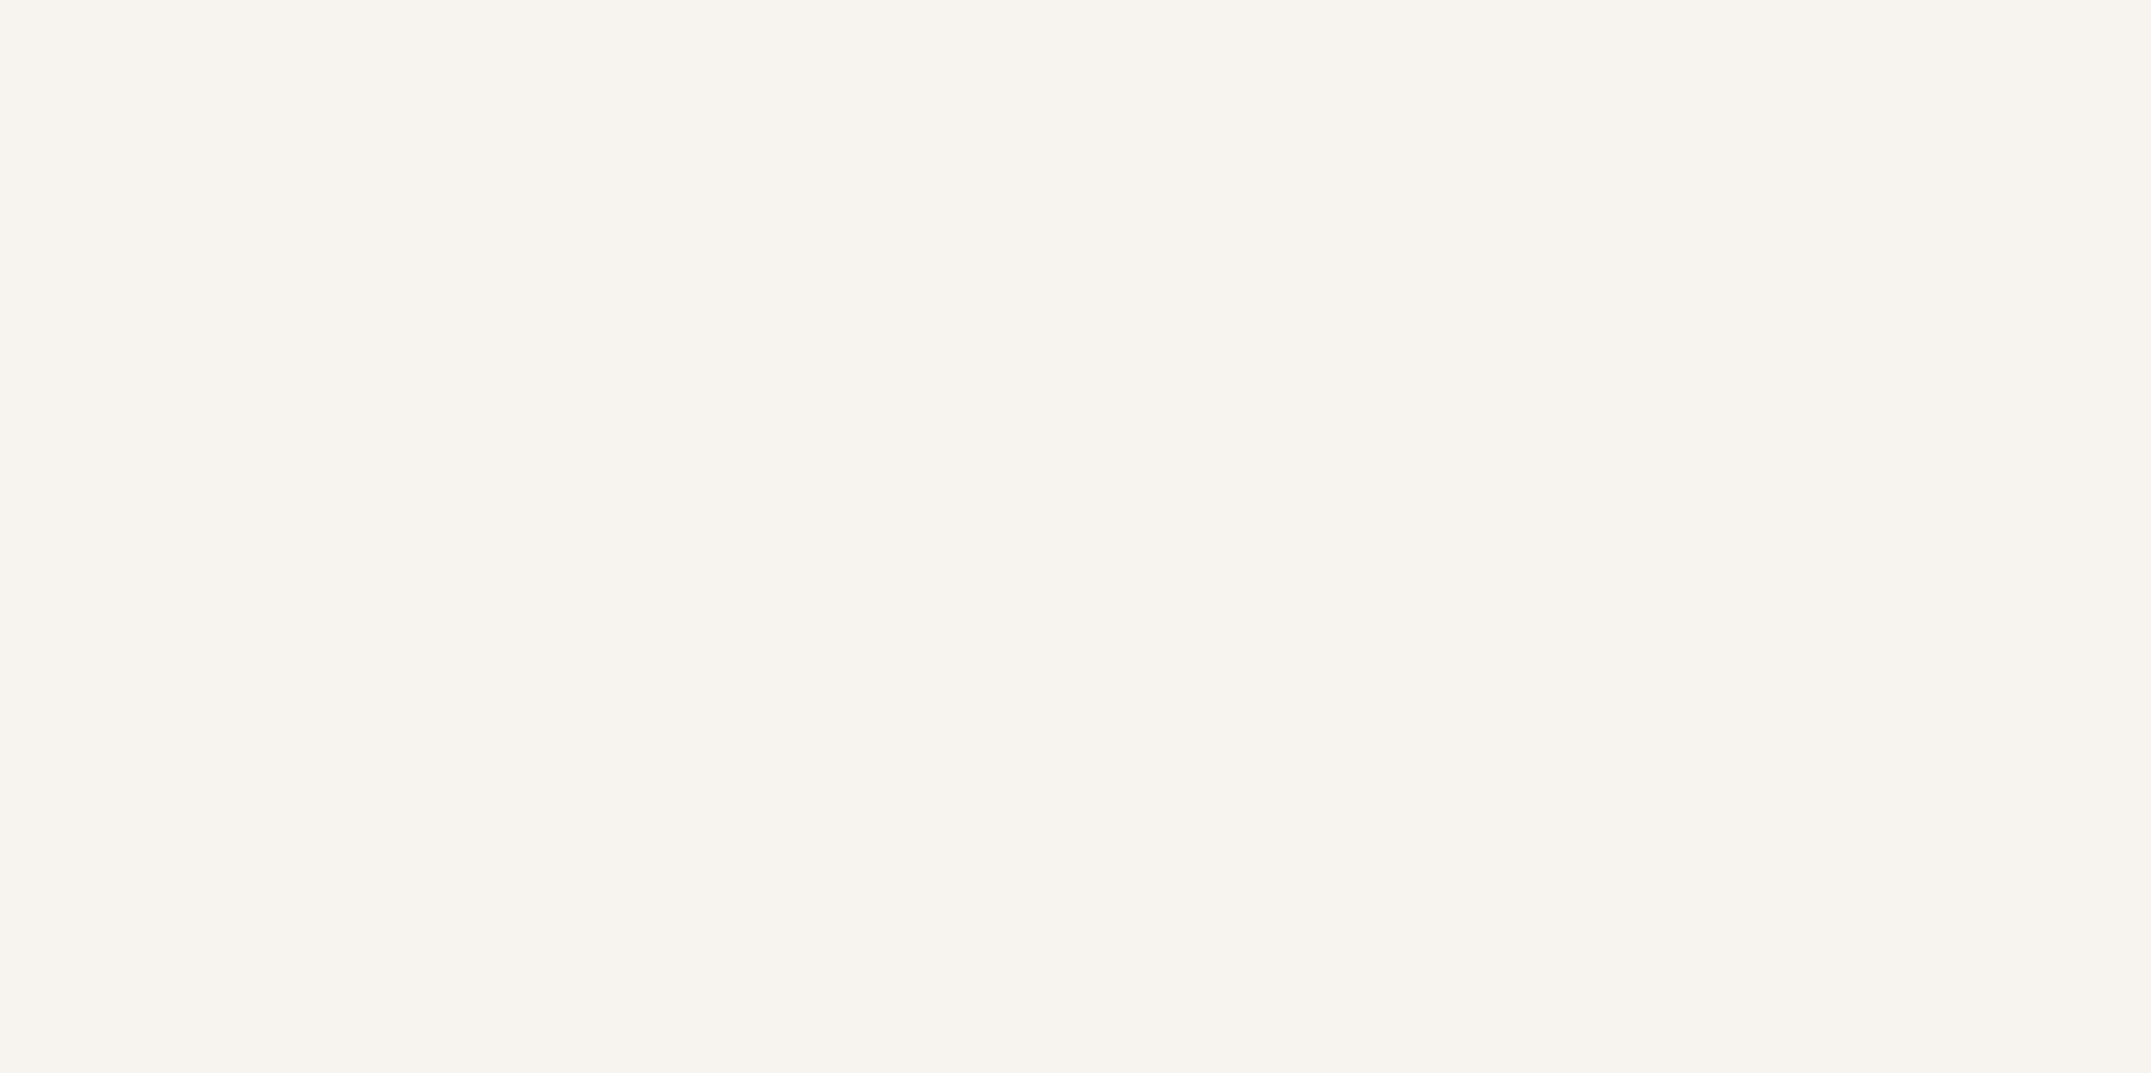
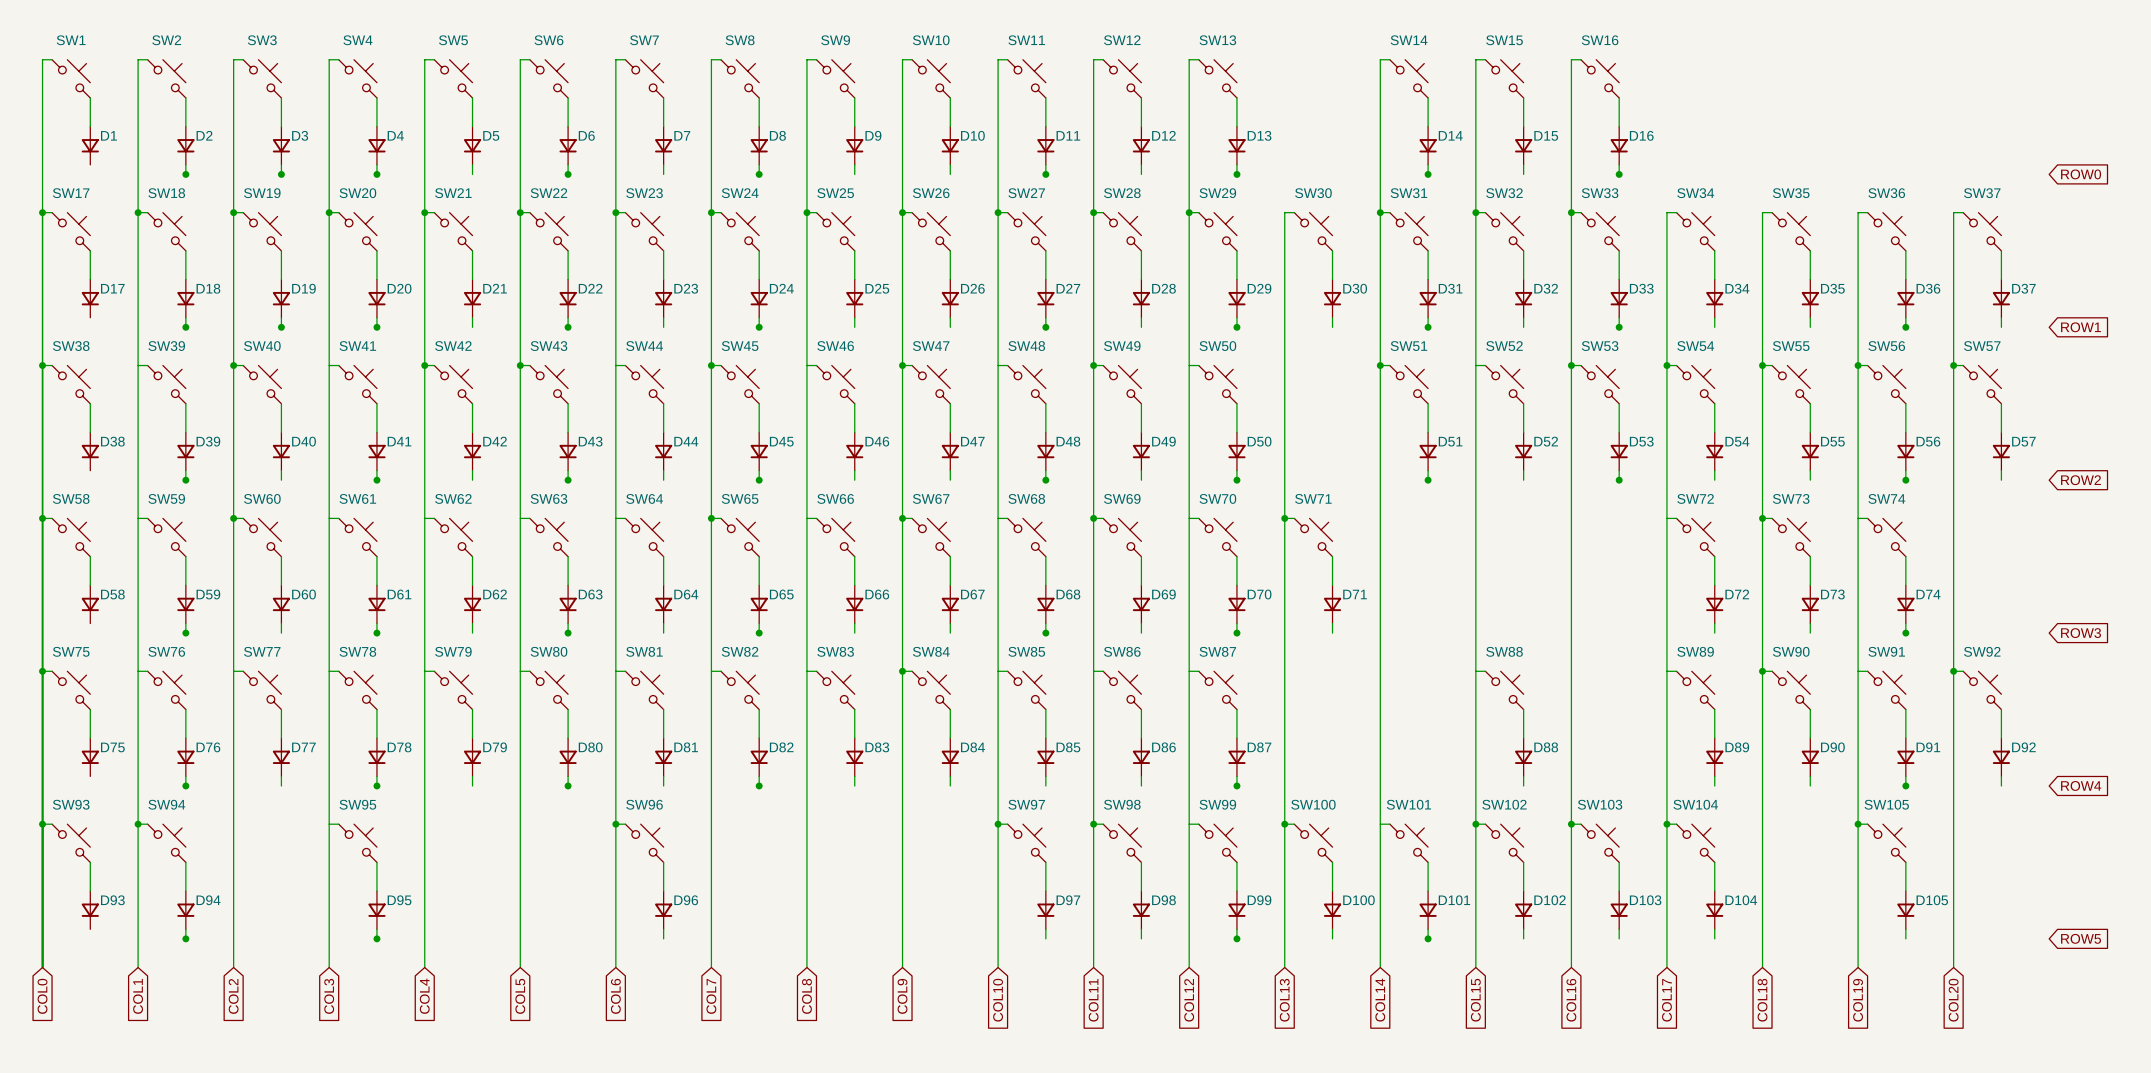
wire: none -> (52, 59) (42, 59) (42, 967)
wire: none -> (147, 59) (138, 59) (138, 967)
wire: none -> (243, 59) (233, 59) (233, 967)
wire: none -> (338, 59) (329, 59) (329, 967)
wire: none -> (434, 59) (424, 59) (424, 967)
wire: none -> (529, 59) (520, 59) (520, 967)
wire: none -> (625, 59) (615, 59) (615, 967)
wire: none -> (720, 59) (711, 59) (711, 967)
wire: none -> (816, 59) (806, 59) (806, 967)
wire: none -> (912, 59) (902, 59) (902, 967)
wire: none -> (1007, 59) (998, 59) (998, 967)
wire: none -> (1103, 59) (1093, 59) (1093, 967)
wire: none -> (1198, 59) (1189, 59) (1189, 967)
wire: none -> (1389, 59) (1380, 59) (1380, 967)
wire: none -> (1485, 59) (1475, 59) (1475, 967)
wire: none -> (1580, 59) (1571, 59) (1571, 967)
SW1: none -> (71, 78)
SW2: none -> (166, 78)
SW3: none -> (262, 78)
SW4: none -> (357, 78)
SW5: none -> (453, 78)
SW6: none -> (548, 78)
SW7: none -> (644, 78)
SW8: none -> (740, 78)
SW9: none -> (835, 78)
SW10: none -> (931, 78)
SW11: none -> (1026, 78)
SW12: none -> (1122, 78)
SW13: none -> (1217, 78)
SW14: none -> (1408, 78)
SW15: none -> (1504, 78)
SW16: none -> (1600, 78)
wire: none -> (90, 97) (90, 126)
wire: none -> (185, 97) (185, 126)
wire: none -> (281, 97) (281, 126)
wire: none -> (376, 97) (376, 126)
wire: none -> (472, 97) (472, 126)
wire: none -> (568, 97) (568, 126)
wire: none -> (663, 97) (663, 126)
wire: none -> (759, 97) (759, 126)
wire: none -> (854, 97) (854, 126)
wire: none -> (950, 97) (950, 126)
wire: none -> (1045, 97) (1045, 126)
wire: none -> (1141, 97) (1141, 126)
wire: none -> (1236, 97) (1236, 126)
wire: none -> (1428, 97) (1428, 126)
wire: none -> (1523, 97) (1523, 126)
wire: none -> (1619, 97) (1619, 126)
D1: none -> (90, 145)
D2: none -> (185, 145)
D3: none -> (281, 145)
D4: none -> (376, 145)
D5: none -> (472, 145)
D6: none -> (568, 145)
D7: none -> (663, 145)
D8: none -> (759, 145)
D9: none -> (854, 145)
D10: none -> (950, 145)
D11: none -> (1045, 145)
D12: none -> (1141, 145)
D13: none -> (1236, 145)
D14: none -> (1428, 145)
D15: none -> (1523, 145)
D16: none -> (1619, 145)
wire: none -> (185, 164) (185, 174)
wire: none -> (281, 164) (281, 174)
wire: none -> (376, 164) (376, 174)
wire: none -> (472, 164) (472, 174)
wire: none -> (568, 164) (568, 174)
wire: none -> (663, 164) (663, 174)
wire: none -> (759, 164) (759, 174)
wire: none -> (854, 164) (854, 174)
wire: none -> (950, 164) (950, 174)
wire: none -> (1045, 164) (1045, 174)
wire: none -> (1141, 164) (1141, 174)
wire: none -> (1236, 164) (1236, 174)
wire: none -> (1428, 164) (1428, 174)
wire: none -> (1523, 164) (1523, 174)
wire: none -> (1619, 164) (1619, 174)
junction: none -> (185, 174)
junction: none -> (281, 174)
junction: none -> (376, 174)
junction: none -> (568, 174)
junction: none -> (759, 174)
junction: none -> (1045, 174)
junction: none -> (1236, 174)
junction: none -> (1428, 174)
junction: none -> (1619, 174)
global label: none -> ROW0 (2081, 174)
wire: none -> (42, 212) (52, 212)
junction: none -> (42, 212)
wire: none -> (138, 212) (147, 212)
junction: none -> (138, 212)
wire: none -> (233, 212) (243, 212)
junction: none -> (233, 212)
wire: none -> (329, 212) (338, 212)
junction: none -> (329, 212)
wire: none -> (424, 212) (434, 212)
junction: none -> (424, 212)
wire: none -> (520, 212) (529, 212)
junction: none -> (520, 212)
wire: none -> (615, 212) (625, 212)
junction: none -> (615, 212)
wire: none -> (711, 212) (720, 212)
junction: none -> (711, 212)
wire: none -> (806, 212) (816, 212)
junction: none -> (806, 212)
wire: none -> (902, 212) (912, 212)
junction: none -> (902, 212)
wire: none -> (998, 212) (1007, 212)
junction: none -> (998, 212)
wire: none -> (1093, 212) (1103, 212)
junction: none -> (1093, 212)
wire: none -> (1189, 212) (1198, 212)
junction: none -> (1189, 212)
wire: none -> (1294, 212) (1284, 212) (1284, 967)
wire: none -> (1380, 212) (1389, 212)
junction: none -> (1380, 212)
wire: none -> (1475, 212) (1485, 212)
junction: none -> (1475, 212)
wire: none -> (1571, 212) (1580, 212)
junction: none -> (1571, 212)
wire: none -> (1676, 212) (1666, 212) (1666, 967)
wire: none -> (1772, 212) (1762, 212) (1762, 967)
wire: none -> (1867, 212) (1858, 212) (1858, 967)
wire: none -> (1963, 212) (1953, 212) (1953, 967)
SW17: none -> (71, 231)
SW18: none -> (166, 231)
SW19: none -> (262, 231)
SW20: none -> (357, 231)
SW21: none -> (453, 231)
SW22: none -> (548, 231)
SW23: none -> (644, 231)
SW24: none -> (740, 231)
SW25: none -> (835, 231)
SW26: none -> (931, 231)
SW27: none -> (1026, 231)
SW28: none -> (1122, 231)
SW29: none -> (1217, 231)
SW30: none -> (1313, 231)
SW31: none -> (1408, 231)
SW32: none -> (1504, 231)
SW33: none -> (1600, 231)
SW34: none -> (1695, 231)
SW35: none -> (1791, 231)
SW36: none -> (1886, 231)
SW37: none -> (1982, 231)
wire: none -> (90, 250) (90, 279)
wire: none -> (185, 250) (185, 279)
wire: none -> (281, 250) (281, 279)
wire: none -> (376, 250) (376, 279)
wire: none -> (472, 250) (472, 279)
wire: none -> (568, 250) (568, 279)
wire: none -> (663, 250) (663, 279)
wire: none -> (759, 250) (759, 279)
wire: none -> (854, 250) (854, 279)
wire: none -> (950, 250) (950, 279)
wire: none -> (1045, 250) (1045, 279)
wire: none -> (1141, 250) (1141, 279)
wire: none -> (1236, 250) (1236, 279)
wire: none -> (1332, 250) (1332, 279)
wire: none -> (1428, 250) (1428, 279)
wire: none -> (1523, 250) (1523, 279)
wire: none -> (1619, 250) (1619, 279)
wire: none -> (1714, 250) (1714, 279)
wire: none -> (1810, 250) (1810, 279)
wire: none -> (1905, 250) (1905, 279)
wire: none -> (2001, 250) (2001, 279)
D17: none -> (90, 298)
D18: none -> (185, 298)
D19: none -> (281, 298)
D20: none -> (376, 298)
D21: none -> (472, 298)
D22: none -> (568, 298)
D23: none -> (663, 298)
D24: none -> (759, 298)
D25: none -> (854, 298)
D26: none -> (950, 298)
D27: none -> (1045, 298)
D28: none -> (1141, 298)
D29: none -> (1236, 298)
D30: none -> (1332, 298)
D31: none -> (1428, 298)
D32: none -> (1523, 298)
D33: none -> (1619, 298)
D34: none -> (1714, 298)
D35: none -> (1810, 298)
D36: none -> (1905, 298)
D37: none -> (2001, 298)
wire: none -> (185, 317) (185, 327)
wire: none -> (281, 317) (281, 327)
wire: none -> (376, 317) (376, 327)
wire: none -> (472, 317) (472, 327)
wire: none -> (568, 317) (568, 327)
wire: none -> (663, 317) (663, 327)
wire: none -> (759, 317) (759, 327)
wire: none -> (854, 317) (854, 327)
wire: none -> (950, 317) (950, 327)
wire: none -> (1045, 317) (1045, 327)
wire: none -> (1141, 317) (1141, 327)
wire: none -> (1236, 317) (1236, 327)
wire: none -> (1332, 317) (1332, 327)
wire: none -> (1428, 317) (1428, 327)
wire: none -> (1523, 317) (1523, 327)
wire: none -> (1619, 317) (1619, 327)
wire: none -> (1714, 317) (1714, 327)
wire: none -> (1810, 317) (1810, 327)
wire: none -> (1905, 317) (1905, 327)
wire: none -> (2001, 317) (2001, 327)
junction: none -> (185, 327)
junction: none -> (281, 327)
junction: none -> (376, 327)
junction: none -> (568, 327)
junction: none -> (759, 327)
junction: none -> (1045, 327)
junction: none -> (1236, 327)
junction: none -> (1428, 327)
junction: none -> (1619, 327)
junction: none -> (1905, 327)
global label: none -> ROW1 (2081, 327)
wire: none -> (42, 365) (52, 365)
junction: none -> (42, 365)
wire: none -> (138, 365) (147, 365)
wire: none -> (233, 365) (243, 365)
junction: none -> (233, 365)
wire: none -> (329, 365) (338, 365)
wire: none -> (424, 365) (434, 365)
junction: none -> (424, 365)
wire: none -> (520, 365) (529, 365)
junction: none -> (520, 365)
wire: none -> (615, 365) (625, 365)
wire: none -> (711, 365) (720, 365)
junction: none -> (711, 365)
wire: none -> (806, 365) (816, 365)
wire: none -> (902, 365) (912, 365)
junction: none -> (902, 365)
wire: none -> (998, 365) (1007, 365)
wire: none -> (1093, 365) (1103, 365)
junction: none -> (1093, 365)
wire: none -> (1189, 365) (1198, 365)
wire: none -> (1380, 365) (1389, 365)
junction: none -> (1380, 365)
wire: none -> (1475, 365) (1485, 365)
wire: none -> (1571, 365) (1580, 365)
junction: none -> (1571, 365)
wire: none -> (1666, 365) (1676, 365)
junction: none -> (1666, 365)
wire: none -> (1762, 365) (1772, 365)
junction: none -> (1762, 365)
wire: none -> (1858, 365) (1867, 365)
junction: none -> (1858, 365)
wire: none -> (1953, 365) (1963, 365)
junction: none -> (1953, 365)
SW38: none -> (71, 384)
SW39: none -> (166, 384)
SW40: none -> (262, 384)
SW41: none -> (357, 384)
SW42: none -> (453, 384)
SW43: none -> (548, 384)
SW44: none -> (644, 384)
SW45: none -> (740, 384)
SW46: none -> (835, 384)
SW47: none -> (931, 384)
SW48: none -> (1026, 384)
SW49: none -> (1122, 384)
SW50: none -> (1217, 384)
SW51: none -> (1408, 384)
SW52: none -> (1504, 384)
SW53: none -> (1600, 384)
SW54: none -> (1695, 384)
SW55: none -> (1791, 384)
SW56: none -> (1886, 384)
SW57: none -> (1982, 384)
wire: none -> (90, 403) (90, 432)
wire: none -> (185, 403) (185, 432)
wire: none -> (281, 403) (281, 432)
wire: none -> (376, 403) (376, 432)
wire: none -> (472, 403) (472, 432)
wire: none -> (568, 403) (568, 432)
wire: none -> (663, 403) (663, 432)
wire: none -> (759, 403) (759, 432)
wire: none -> (854, 403) (854, 432)
wire: none -> (950, 403) (950, 432)
wire: none -> (1045, 403) (1045, 432)
wire: none -> (1141, 403) (1141, 432)
wire: none -> (1236, 403) (1236, 432)
wire: none -> (1428, 403) (1428, 432)
wire: none -> (1523, 403) (1523, 432)
wire: none -> (1619, 403) (1619, 432)
wire: none -> (1714, 403) (1714, 432)
wire: none -> (1810, 403) (1810, 432)
wire: none -> (1905, 403) (1905, 432)
wire: none -> (2001, 403) (2001, 432)
D38: none -> (90, 451)
D39: none -> (185, 451)
D40: none -> (281, 451)
D41: none -> (376, 451)
D42: none -> (472, 451)
D43: none -> (568, 451)
D44: none -> (663, 451)
D45: none -> (759, 451)
D46: none -> (854, 451)
D47: none -> (950, 451)
D48: none -> (1045, 451)
D49: none -> (1141, 451)
D50: none -> (1236, 451)
D51: none -> (1428, 451)
D52: none -> (1523, 451)
D53: none -> (1619, 451)
D54: none -> (1714, 451)
D55: none -> (1810, 451)
D56: none -> (1905, 451)
D57: none -> (2001, 451)
wire: none -> (185, 470) (185, 480)
wire: none -> (281, 470) (281, 480)
wire: none -> (376, 470) (376, 480)
wire: none -> (472, 470) (472, 480)
wire: none -> (568, 470) (568, 480)
wire: none -> (663, 470) (663, 480)
wire: none -> (759, 470) (759, 480)
wire: none -> (854, 470) (854, 480)
wire: none -> (950, 470) (950, 480)
wire: none -> (1045, 470) (1045, 480)
wire: none -> (1141, 470) (1141, 480)
wire: none -> (1236, 470) (1236, 480)
wire: none -> (1428, 470) (1428, 480)
wire: none -> (1523, 470) (1523, 480)
wire: none -> (1619, 470) (1619, 480)
wire: none -> (1714, 470) (1714, 480)
wire: none -> (1810, 470) (1810, 480)
wire: none -> (1905, 470) (1905, 480)
wire: none -> (2001, 470) (2001, 480)
junction: none -> (185, 480)
junction: none -> (376, 480)
junction: none -> (568, 480)
junction: none -> (759, 480)
junction: none -> (1045, 480)
junction: none -> (1236, 480)
junction: none -> (1428, 480)
junction: none -> (1619, 480)
junction: none -> (1905, 480)
global label: none -> ROW2 (2080, 480)
wire: none -> (42, 518) (52, 518)
junction: none -> (42, 518)
wire: none -> (138, 518) (147, 518)
wire: none -> (233, 518) (243, 518)
junction: none -> (233, 518)
wire: none -> (329, 518) (338, 518)
wire: none -> (424, 518) (434, 518)
wire: none -> (520, 518) (529, 518)
wire: none -> (615, 518) (625, 518)
wire: none -> (711, 518) (720, 518)
junction: none -> (711, 518)
wire: none -> (806, 518) (816, 518)
wire: none -> (902, 518) (912, 518)
junction: none -> (902, 518)
wire: none -> (998, 518) (1007, 518)
wire: none -> (1093, 518) (1103, 518)
junction: none -> (1093, 518)
wire: none -> (1189, 518) (1198, 518)
wire: none -> (1284, 518) (1294, 518)
junction: none -> (1284, 518)
wire: none -> (1666, 518) (1676, 518)
wire: none -> (1762, 518) (1772, 518)
junction: none -> (1762, 518)
wire: none -> (1858, 518) (1867, 518)
SW58: none -> (71, 537)
SW59: none -> (166, 537)
SW60: none -> (262, 537)
SW61: none -> (357, 537)
SW62: none -> (453, 537)
SW63: none -> (548, 537)
SW64: none -> (644, 537)
SW65: none -> (740, 537)
SW66: none -> (835, 537)
SW67: none -> (931, 537)
SW68: none -> (1026, 537)
SW69: none -> (1122, 537)
SW70: none -> (1217, 537)
SW71: none -> (1313, 537)
SW72: none -> (1695, 537)
SW73: none -> (1791, 537)
SW74: none -> (1886, 537)
wire: none -> (90, 556) (90, 585)
wire: none -> (185, 556) (185, 585)
wire: none -> (281, 556) (281, 585)
wire: none -> (376, 556) (376, 585)
wire: none -> (472, 556) (472, 585)
wire: none -> (568, 556) (568, 585)
wire: none -> (663, 556) (663, 585)
wire: none -> (759, 556) (759, 585)
wire: none -> (854, 556) (854, 585)
wire: none -> (950, 556) (950, 585)
wire: none -> (1045, 556) (1045, 585)
wire: none -> (1141, 556) (1141, 585)
wire: none -> (1236, 556) (1236, 585)
wire: none -> (1332, 556) (1332, 585)
wire: none -> (1714, 556) (1714, 585)
wire: none -> (1810, 556) (1810, 585)
wire: none -> (1905, 556) (1905, 585)
D58: none -> (90, 604)
D59: none -> (185, 604)
D60: none -> (281, 604)
D61: none -> (376, 604)
D62: none -> (472, 604)
D63: none -> (568, 604)
D64: none -> (663, 604)
D65: none -> (759, 604)
D66: none -> (854, 604)
D67: none -> (950, 604)
D68: none -> (1045, 604)
D69: none -> (1141, 604)
D70: none -> (1236, 604)
D71: none -> (1332, 604)
D72: none -> (1714, 604)
D73: none -> (1810, 604)
D74: none -> (1905, 604)
wire: none -> (185, 623) (185, 633)
wire: none -> (281, 623) (281, 633)
wire: none -> (376, 623) (376, 633)
wire: none -> (472, 623) (472, 633)
wire: none -> (568, 623) (568, 633)
wire: none -> (663, 623) (663, 633)
wire: none -> (759, 623) (759, 633)
wire: none -> (854, 623) (854, 633)
wire: none -> (950, 623) (950, 633)
wire: none -> (1045, 623) (1045, 633)
wire: none -> (1141, 623) (1141, 633)
wire: none -> (1236, 623) (1236, 633)
wire: none -> (1332, 623) (1332, 633)
wire: none -> (1714, 623) (1714, 633)
wire: none -> (1810, 623) (1810, 633)
wire: none -> (1905, 623) (1905, 633)
junction: none -> (185, 633)
junction: none -> (376, 633)
junction: none -> (568, 633)
junction: none -> (759, 633)
junction: none -> (1045, 633)
junction: none -> (1236, 633)
junction: none -> (1905, 633)
global label: none -> ROW3 (2081, 633)
wire: none -> (42, 671) (52, 671)
junction: none -> (42, 671)
wire: none -> (138, 671) (147, 671)
wire: none -> (233, 671) (243, 671)
wire: none -> (329, 671) (338, 671)
wire: none -> (424, 671) (434, 671)
wire: none -> (520, 671) (529, 671)
wire: none -> (615, 671) (625, 671)
wire: none -> (711, 671) (720, 671)
wire: none -> (806, 671) (816, 671)
wire: none -> (902, 671) (912, 671)
junction: none -> (902, 671)
wire: none -> (998, 671) (1007, 671)
wire: none -> (1093, 671) (1103, 671)
wire: none -> (1189, 671) (1198, 671)
wire: none -> (1475, 671) (1485, 671)
wire: none -> (1666, 671) (1676, 671)
wire: none -> (1762, 671) (1772, 671)
junction: none -> (1762, 671)
wire: none -> (1858, 671) (1867, 671)
wire: none -> (1953, 671) (1963, 671)
junction: none -> (1953, 671)
SW75: none -> (71, 690)
SW76: none -> (166, 690)
SW77: none -> (262, 690)
SW78: none -> (357, 690)
SW79: none -> (453, 690)
SW80: none -> (548, 690)
SW81: none -> (644, 690)
SW82: none -> (740, 690)
SW83: none -> (835, 690)
SW84: none -> (931, 690)
SW85: none -> (1026, 690)
SW86: none -> (1122, 690)
SW87: none -> (1217, 690)
SW88: none -> (1504, 690)
SW89: none -> (1695, 690)
SW90: none -> (1791, 690)
SW91: none -> (1886, 690)
SW92: none -> (1982, 690)
wire: none -> (90, 709) (90, 738)
wire: none -> (185, 709) (185, 738)
wire: none -> (281, 709) (281, 738)
wire: none -> (376, 709) (376, 738)
wire: none -> (472, 709) (472, 738)
wire: none -> (568, 709) (568, 738)
wire: none -> (663, 709) (663, 738)
wire: none -> (759, 709) (759, 738)
wire: none -> (854, 709) (854, 738)
wire: none -> (950, 709) (950, 738)
wire: none -> (1045, 709) (1045, 738)
wire: none -> (1141, 709) (1141, 738)
wire: none -> (1236, 709) (1236, 738)
wire: none -> (1523, 709) (1523, 738)
wire: none -> (1714, 709) (1714, 738)
wire: none -> (1810, 709) (1810, 738)
wire: none -> (1905, 709) (1905, 738)
wire: none -> (2001, 709) (2001, 738)
D75: none -> (90, 757)
D76: none -> (185, 757)
D77: none -> (281, 757)
D78: none -> (376, 757)
D79: none -> (472, 757)
D80: none -> (568, 757)
D81: none -> (663, 757)
D82: none -> (759, 757)
D83: none -> (854, 757)
D84: none -> (950, 757)
D85: none -> (1045, 757)
D86: none -> (1141, 757)
D87: none -> (1236, 757)
D88: none -> (1523, 757)
D89: none -> (1714, 757)
D90: none -> (1810, 757)
D91: none -> (1905, 757)
D92: none -> (2001, 757)
wire: none -> (185, 776) (185, 785)
wire: none -> (281, 776) (281, 785)
wire: none -> (376, 776) (376, 785)
wire: none -> (472, 776) (472, 785)
wire: none -> (568, 776) (568, 785)
wire: none -> (663, 776) (663, 785)
wire: none -> (759, 776) (759, 785)
wire: none -> (854, 776) (854, 785)
wire: none -> (950, 776) (950, 785)
wire: none -> (1045, 776) (1045, 785)
wire: none -> (1141, 776) (1141, 785)
wire: none -> (1236, 776) (1236, 785)
wire: none -> (1523, 776) (1523, 785)
wire: none -> (1714, 776) (1714, 785)
wire: none -> (1810, 776) (1810, 785)
wire: none -> (1905, 776) (1905, 785)
wire: none -> (2001, 776) (2001, 785)
junction: none -> (185, 785)
junction: none -> (376, 785)
junction: none -> (568, 785)
junction: none -> (759, 785)
junction: none -> (1236, 785)
junction: none -> (1905, 785)
global label: none -> ROW4 (2081, 785)
wire: none -> (42, 824) (52, 824)
junction: none -> (42, 824)
wire: none -> (138, 824) (147, 824)
junction: none -> (138, 824)
wire: none -> (329, 824) (338, 824)
wire: none -> (615, 824) (625, 824)
junction: none -> (615, 824)
wire: none -> (998, 824) (1007, 824)
junction: none -> (998, 824)
wire: none -> (1093, 824) (1103, 824)
junction: none -> (1093, 824)
wire: none -> (1189, 824) (1198, 824)
wire: none -> (1284, 824) (1294, 824)
junction: none -> (1284, 824)
wire: none -> (1380, 824) (1389, 824)
wire: none -> (1475, 824) (1485, 824)
junction: none -> (1475, 824)
wire: none -> (1571, 824) (1580, 824)
junction: none -> (1571, 824)
wire: none -> (1666, 824) (1676, 824)
junction: none -> (1666, 824)
wire: none -> (1858, 824) (1867, 824)
junction: none -> (1858, 824)
SW93: none -> (71, 843)
SW94: none -> (166, 843)
SW95: none -> (357, 843)
SW96: none -> (644, 843)
SW97: none -> (1026, 843)
SW98: none -> (1122, 843)
SW99: none -> (1217, 843)
SW100: none -> (1313, 843)
SW101: none -> (1408, 843)
SW102: none -> (1504, 843)
SW103: none -> (1600, 843)
SW104: none -> (1695, 843)
SW105: none -> (1886, 843)
wire: none -> (90, 862) (90, 891)
wire: none -> (185, 862) (185, 891)
wire: none -> (376, 862) (376, 891)
wire: none -> (663, 862) (663, 891)
wire: none -> (1045, 862) (1045, 891)
wire: none -> (1141, 862) (1141, 891)
wire: none -> (1236, 862) (1236, 891)
wire: none -> (1332, 862) (1332, 891)
wire: none -> (1428, 862) (1428, 891)
wire: none -> (1523, 862) (1523, 891)
wire: none -> (1619, 862) (1619, 891)
wire: none -> (1714, 862) (1714, 891)
wire: none -> (1905, 862) (1905, 891)
D93: none -> (90, 910)
D94: none -> (185, 910)
D95: none -> (376, 910)
D96: none -> (663, 910)
D97: none -> (1045, 910)
D98: none -> (1141, 910)
D99: none -> (1236, 910)
D100: none -> (1332, 910)
D101: none -> (1428, 910)
D102: none -> (1523, 910)
D103: none -> (1619, 910)
D104: none -> (1714, 910)
D105: none -> (1905, 910)
wire: none -> (185, 929) (185, 938)
wire: none -> (376, 929) (376, 938)
wire: none -> (663, 929) (663, 938)
wire: none -> (1045, 929) (1045, 938)
wire: none -> (1141, 929) (1141, 938)
wire: none -> (1236, 929) (1236, 938)
wire: none -> (1332, 929) (1332, 938)
wire: none -> (1428, 929) (1428, 938)
wire: none -> (1523, 929) (1523, 938)
wire: none -> (1619, 929) (1619, 938)
wire: none -> (1714, 929) (1714, 938)
wire: none -> (1905, 929) (1905, 938)
junction: none -> (185, 938)
junction: none -> (376, 938)
junction: none -> (1236, 938)
junction: none -> (1428, 938)
global label: none -> ROW5 (2081, 938)
global label: none -> COL0 (42, 996)
global label: none -> COL1 (138, 996)
global label: none -> COL2 (233, 996)
global label: none -> COL3 (329, 996)
global label: none -> COL4 (424, 996)
global label: none -> COL5 (520, 996)
global label: none -> COL6 (615, 996)
global label: none -> COL7 (711, 996)
global label: none -> COL8 (806, 996)
global label: none -> COL9 (902, 996)
global label: none -> COL10 (998, 1000)
global label: none -> COL11 (1093, 1000)
global label: none -> COL12 (1189, 1000)
global label: none -> COL13 (1284, 1000)
global label: none -> COL14 (1380, 1000)
global label: none -> COL15 (1475, 1000)
global label: none -> COL16 (1571, 1000)
global label: none -> COL17 (1666, 1000)
global label: none -> COL18 (1762, 1000)
global label: none -> COL19 (1858, 1000)
global label: none -> COL20 (1953, 1000)

